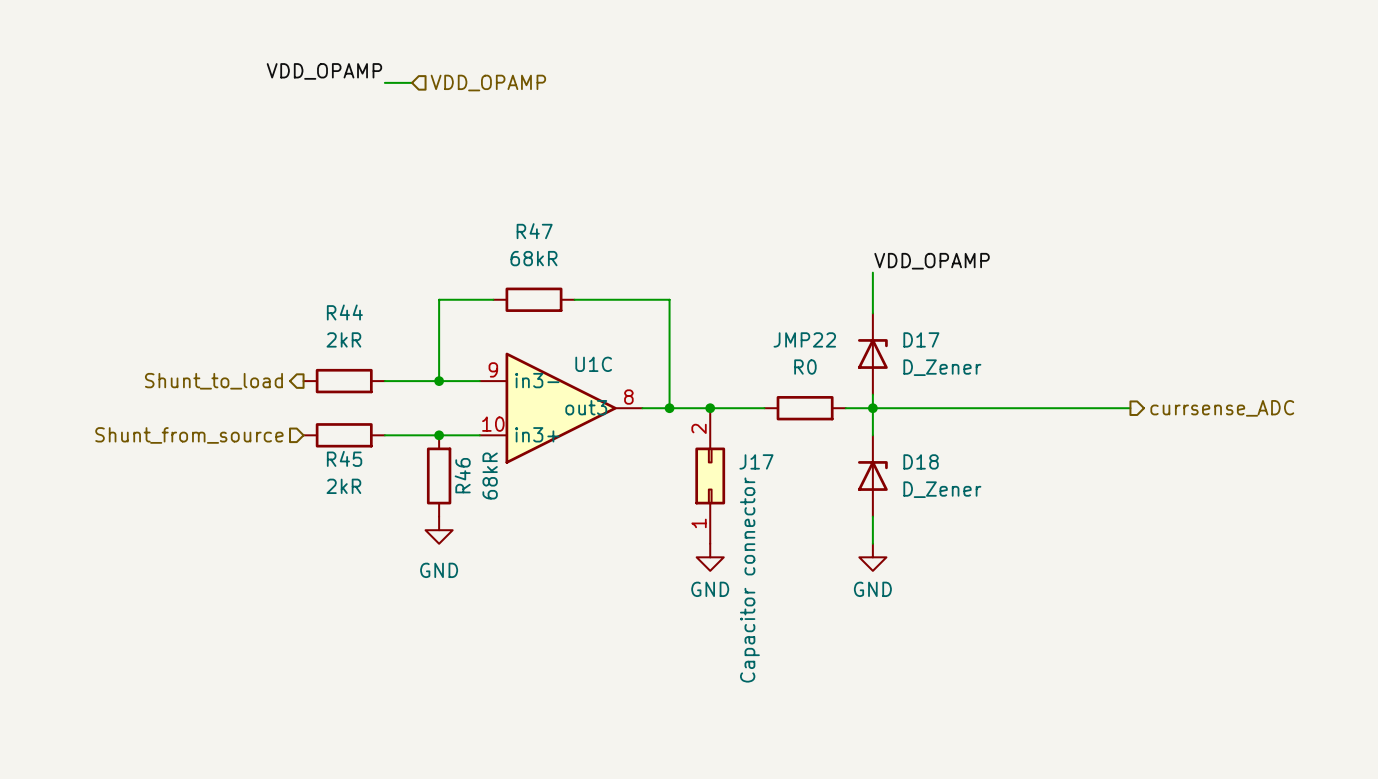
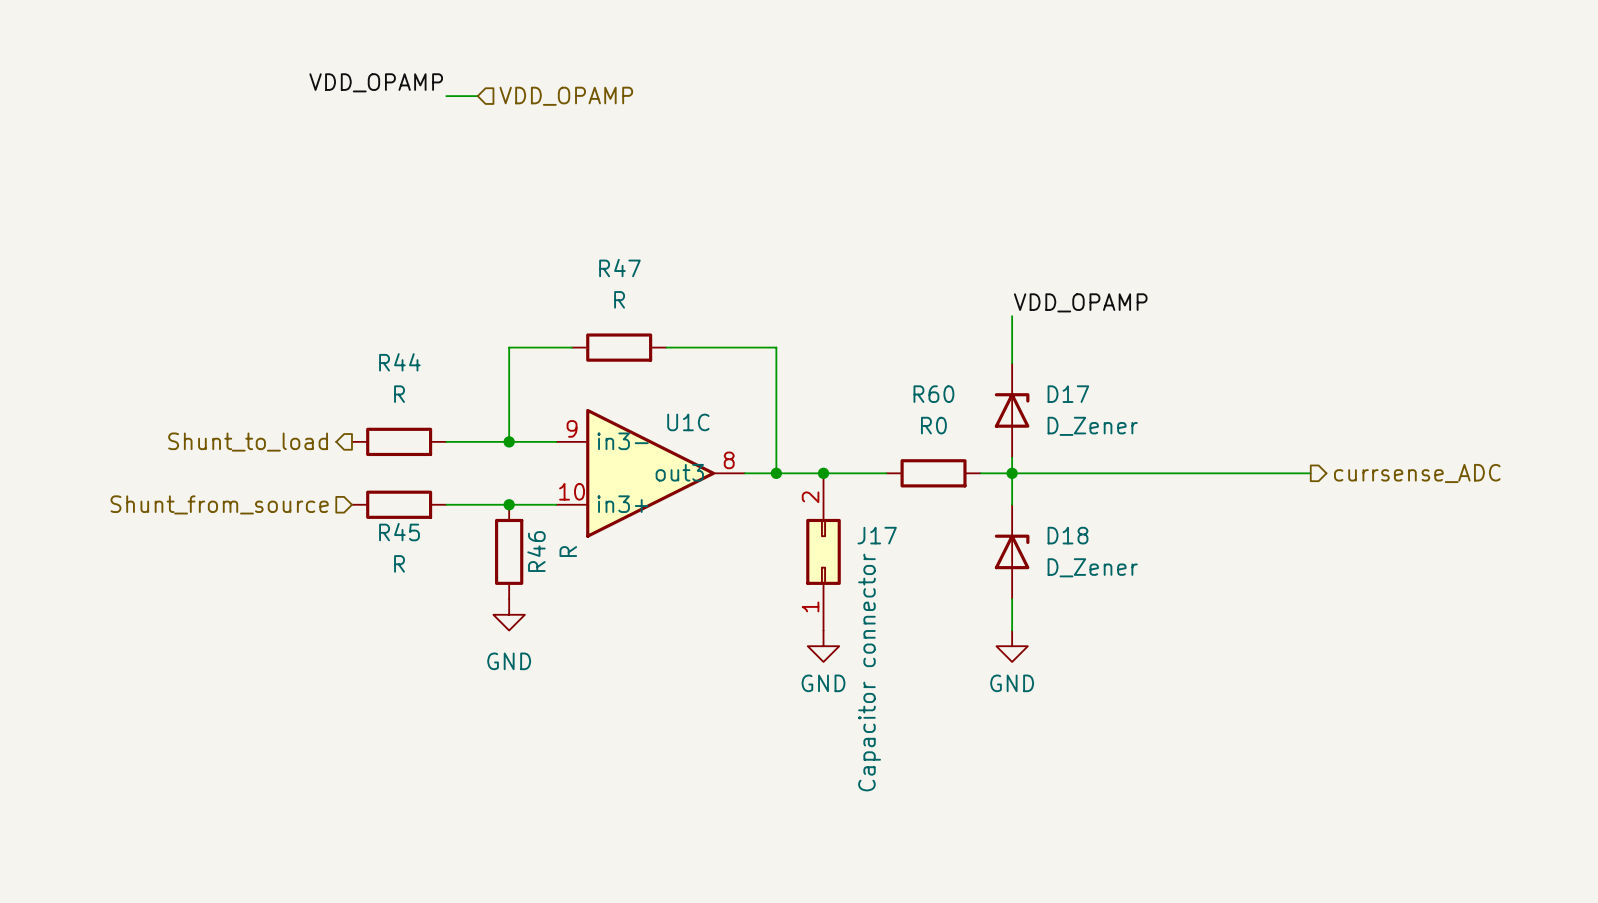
R47 value: 68kR (534, 258) -> R (619, 299)
R44 value: 2kR (343, 339) -> R (399, 394)
JMP22 name: JMP22 (804, 339) -> R60 (933, 394)
R46 value: 68kR (490, 475) -> R (568, 551)
R45 value: 2kR (343, 486) -> R (399, 563)

